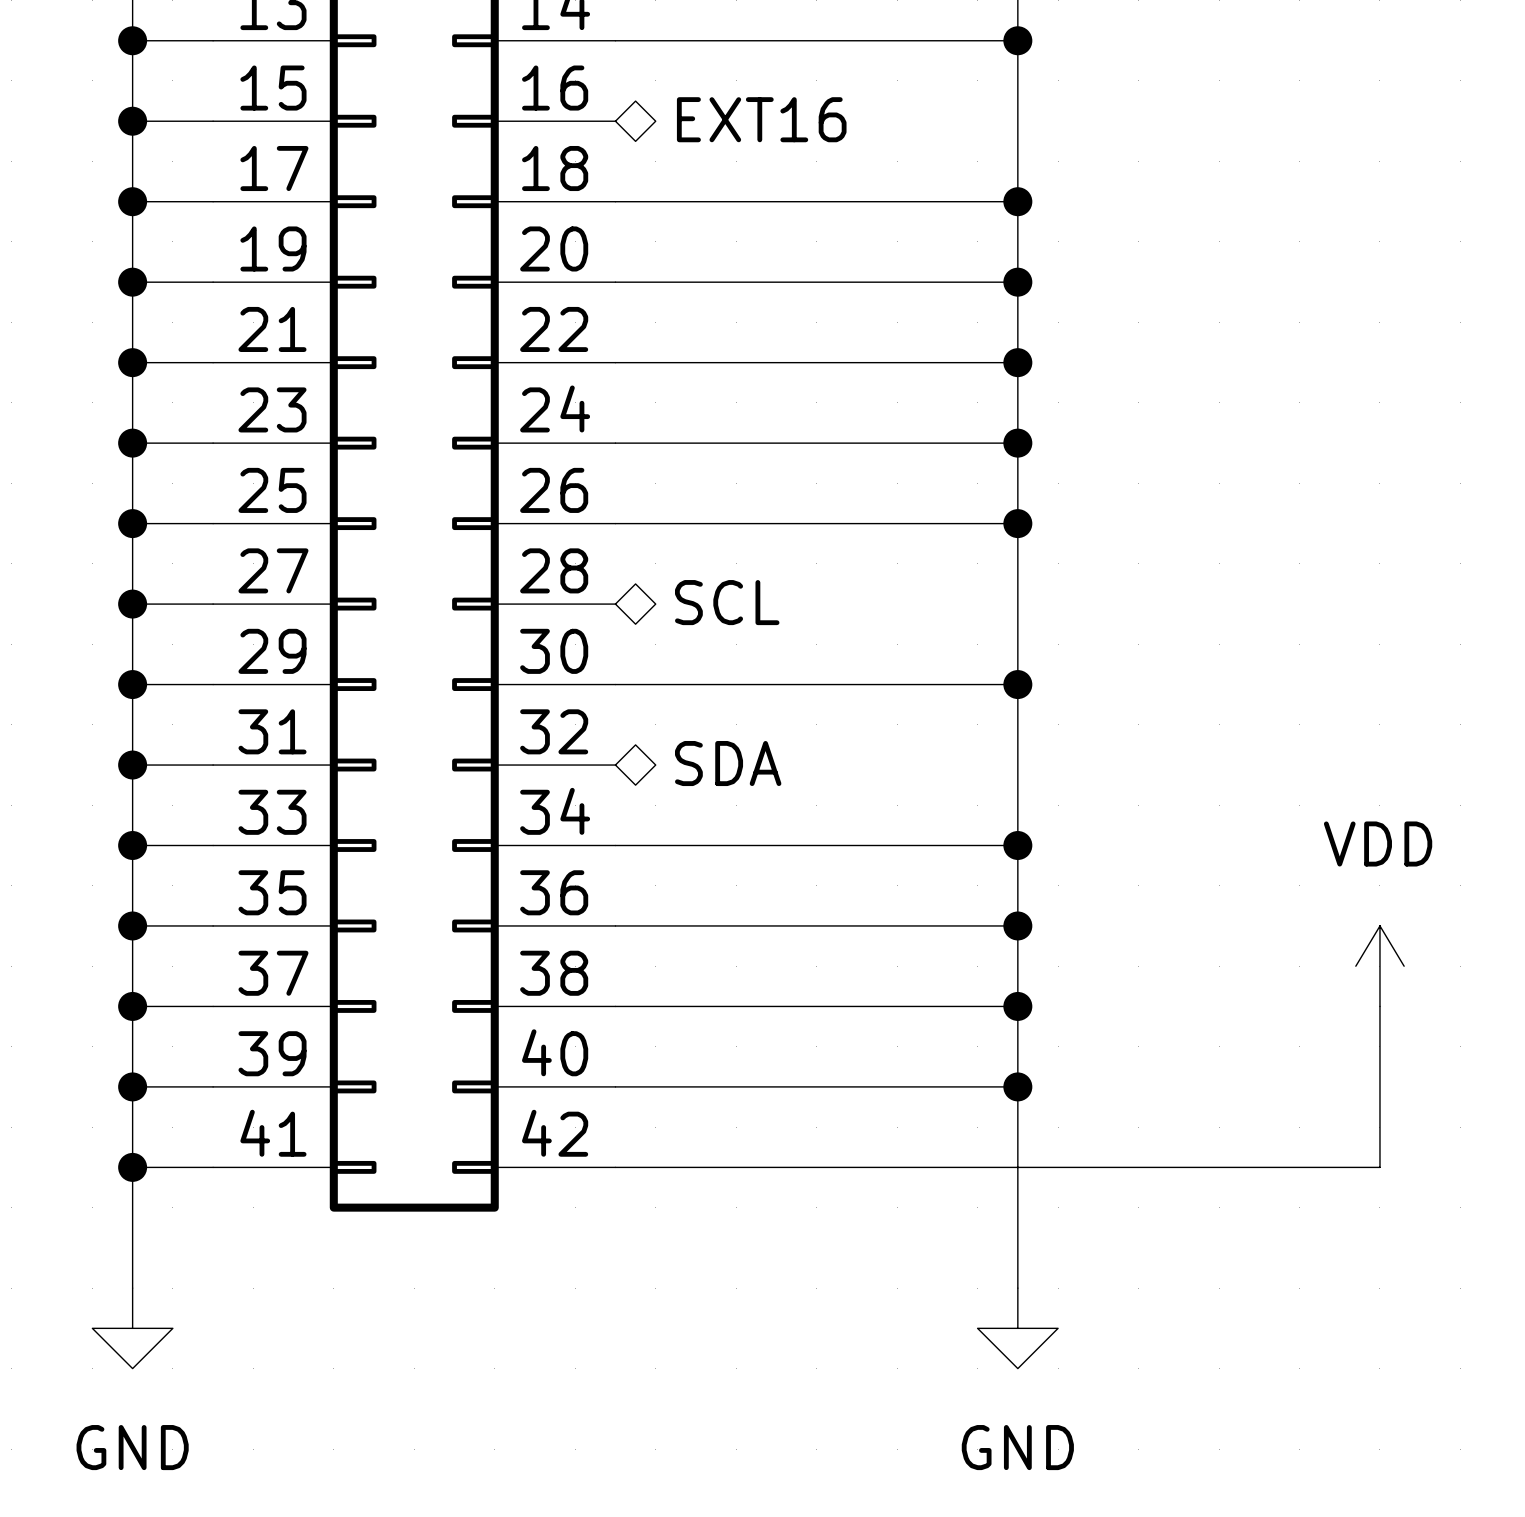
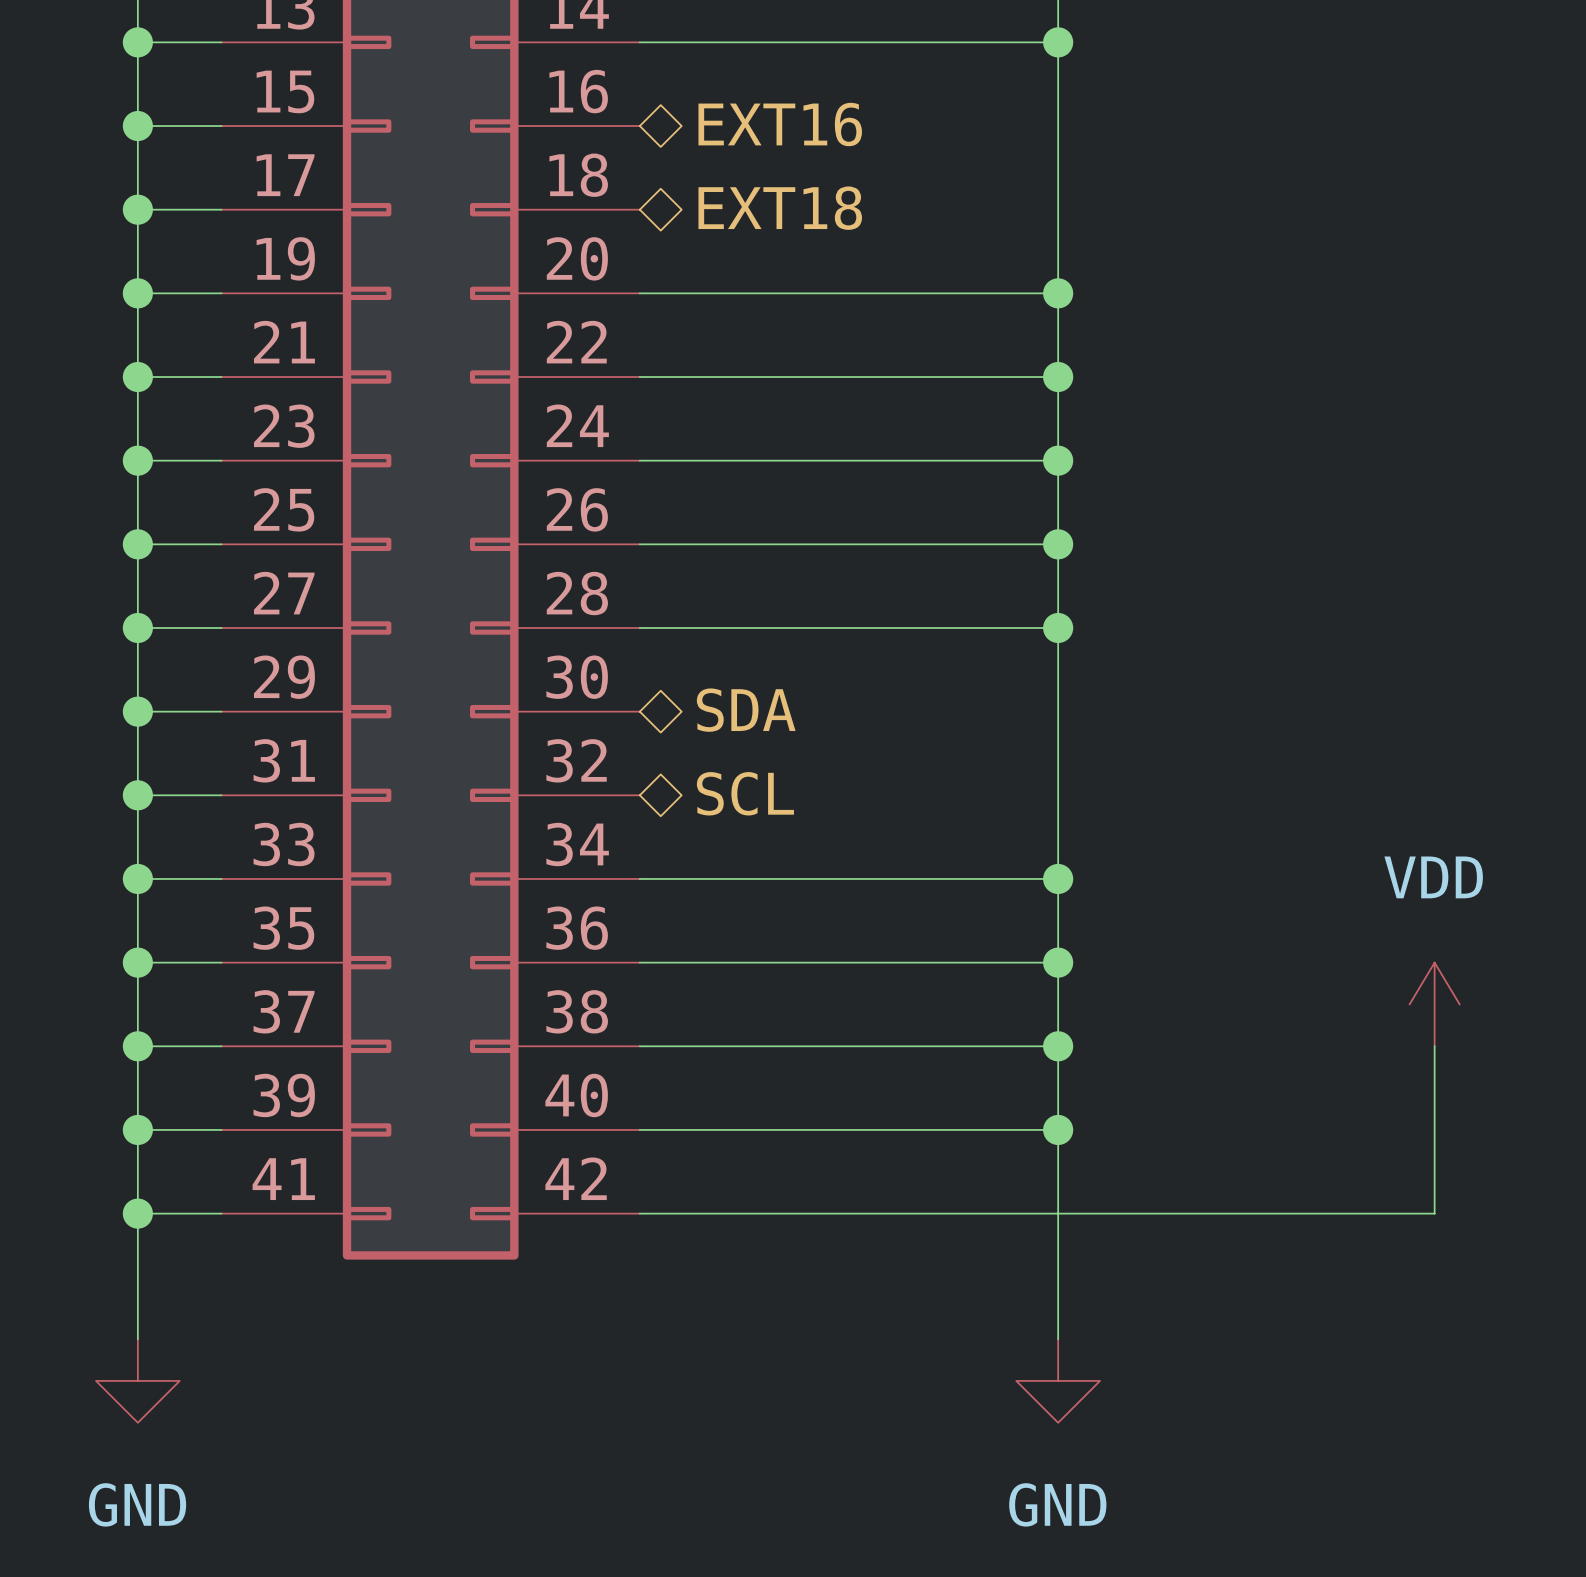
hierarchical label: none -> EXT18 (780, 208)
wire: (615, 201) (1017, 201) -> none
junction: (1017, 201) -> none
hierarchical label: SCL (727, 602) -> none
hierarchical label: none -> SDA (746, 710)
wire: (615, 684) (1017, 684) -> (639, 627) (1058, 627)
junction position: (1017, 684) -> (1058, 627)
hierarchical label: SDA (728, 763) -> SCL (745, 793)

